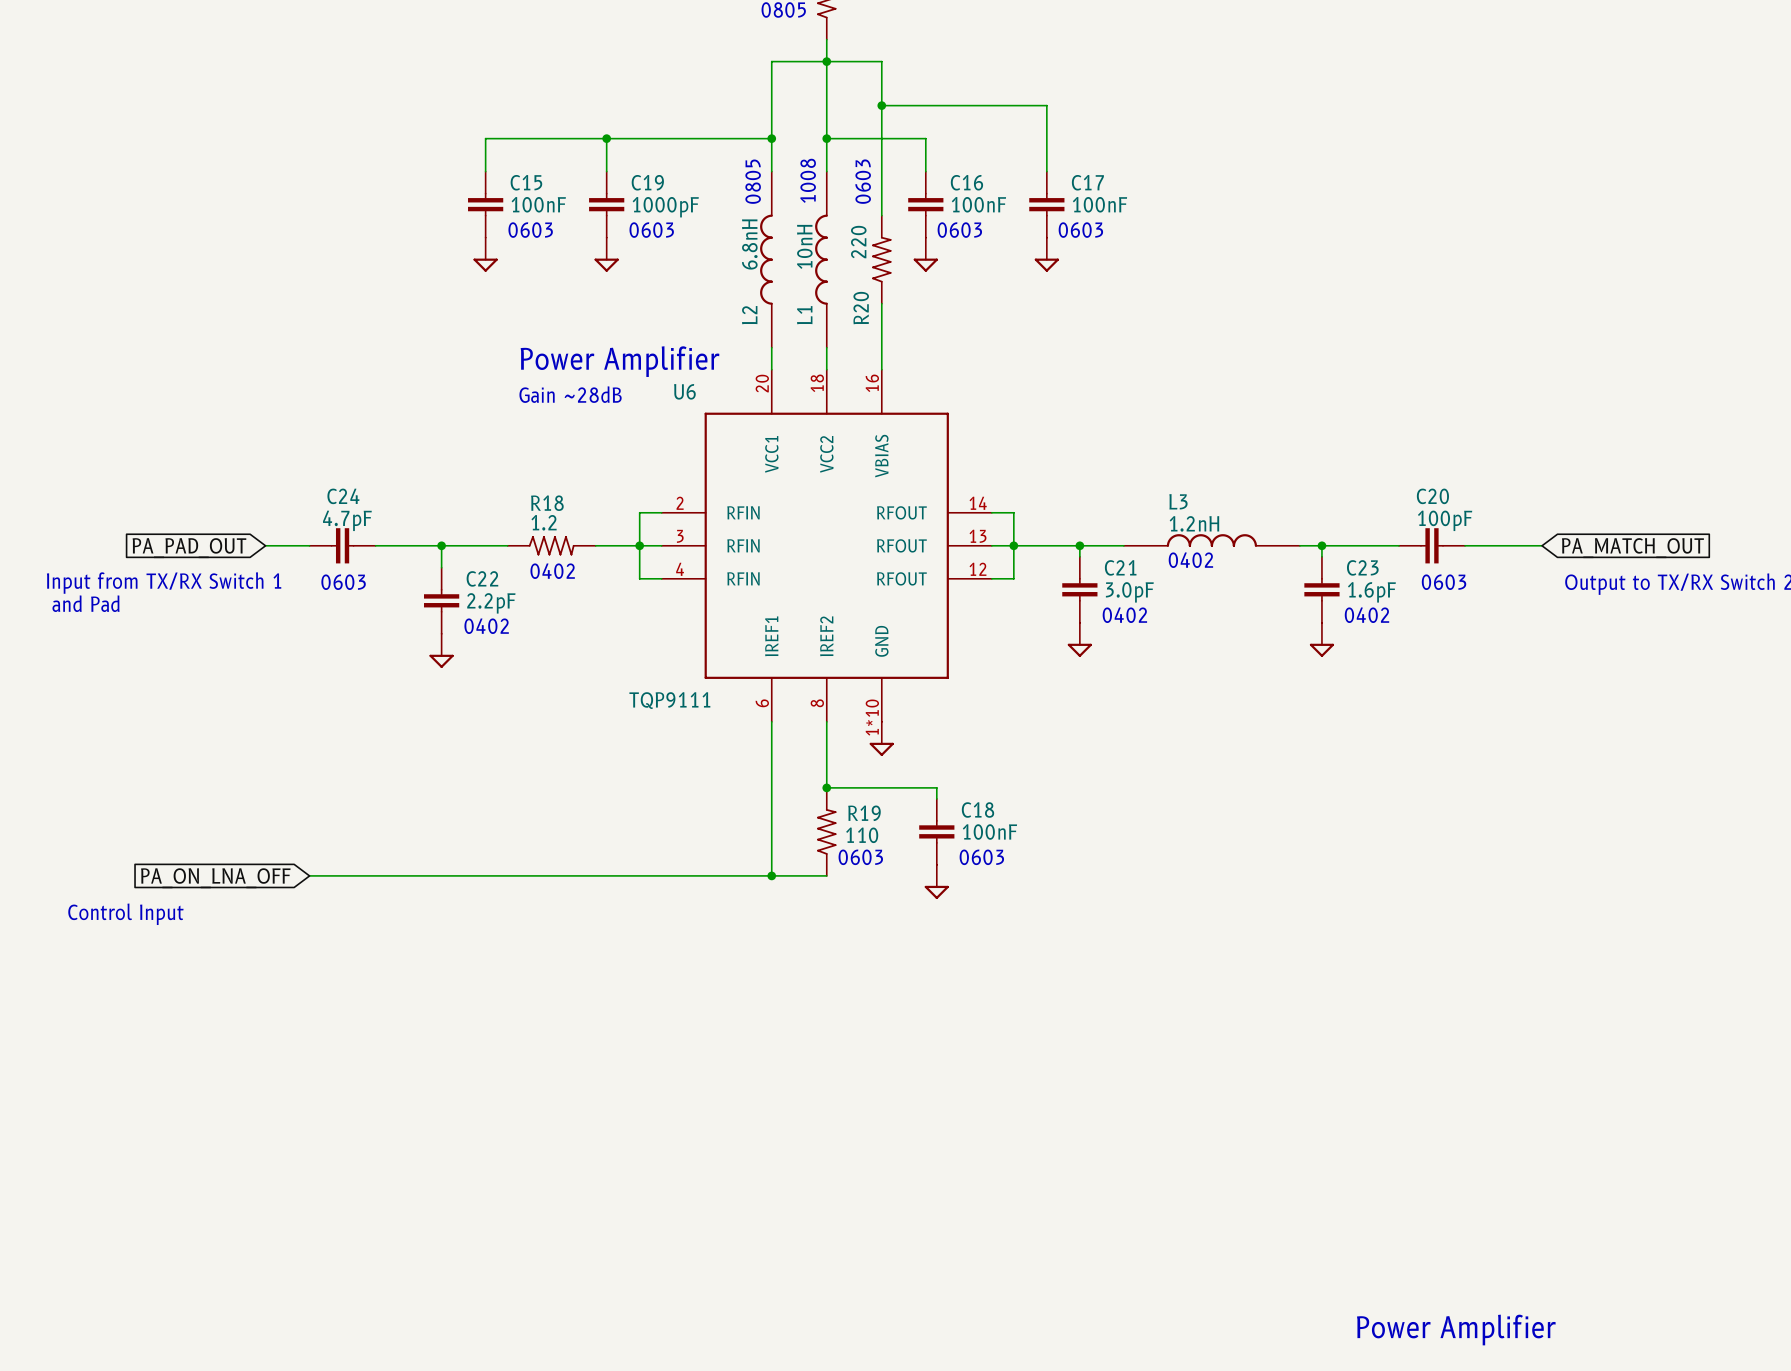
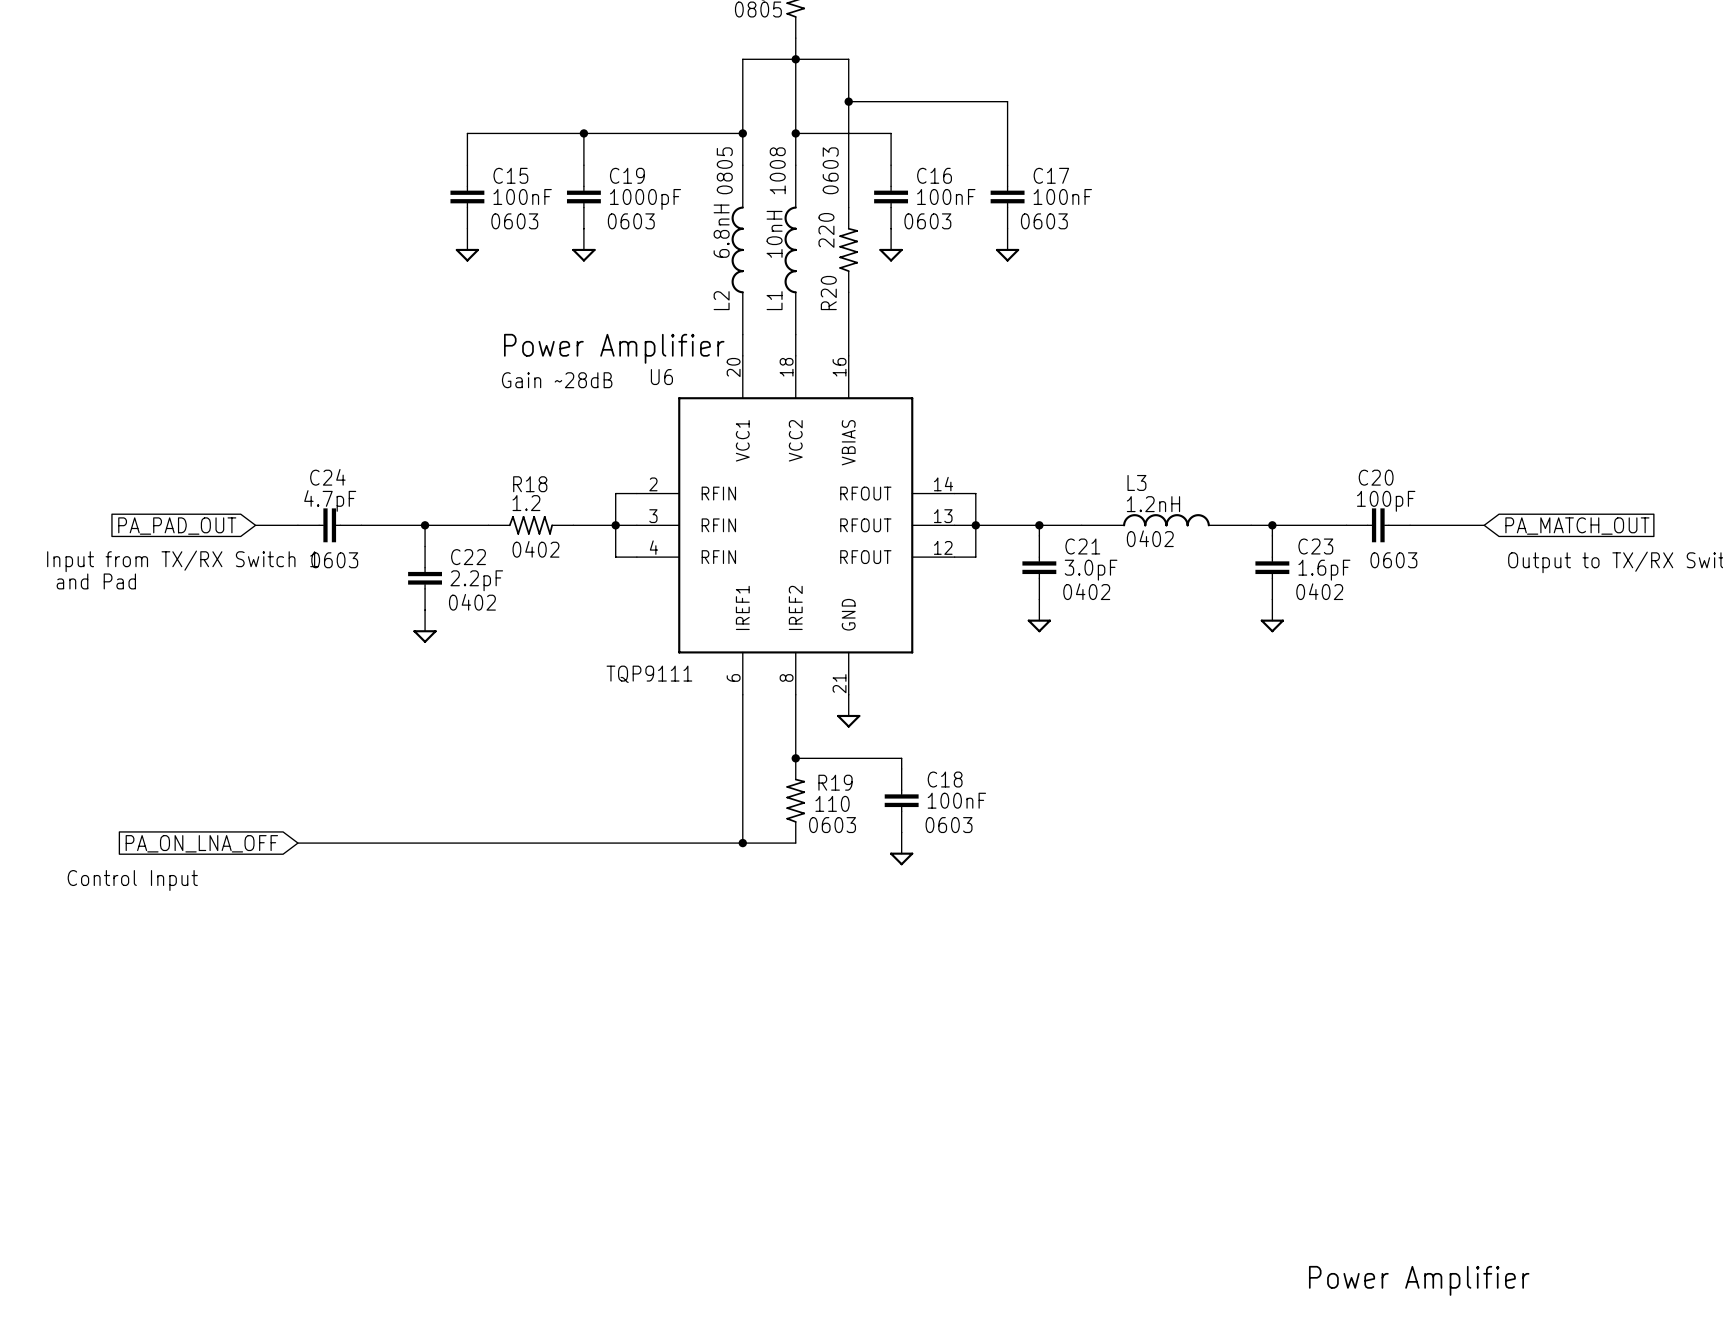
U6 pin number: 1*10 (872, 717) -> 21 (839, 683)

